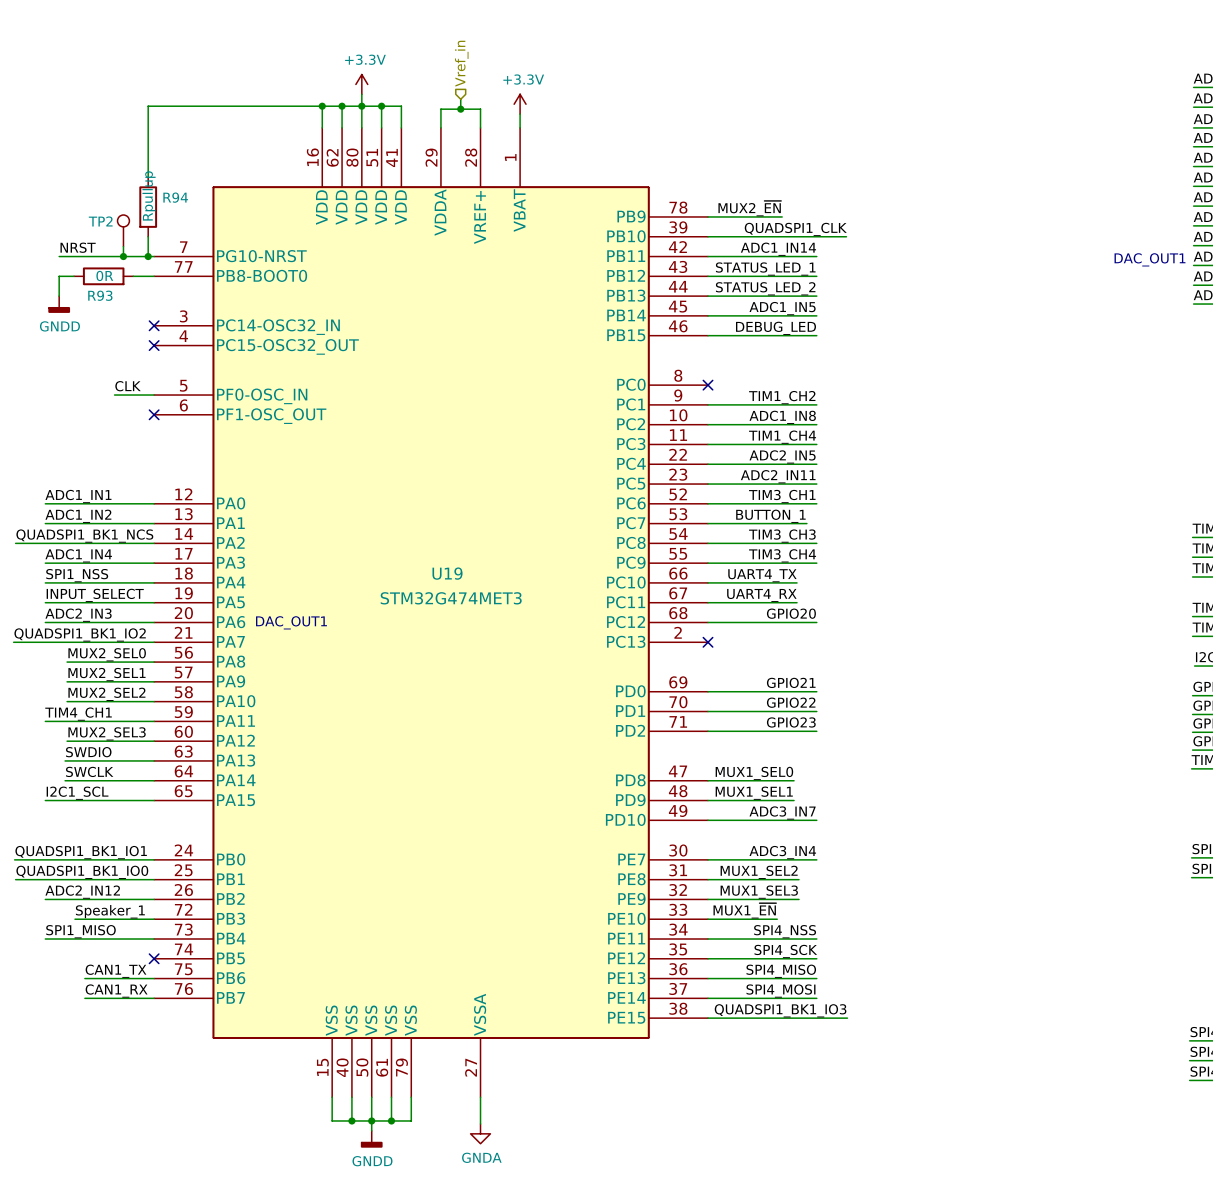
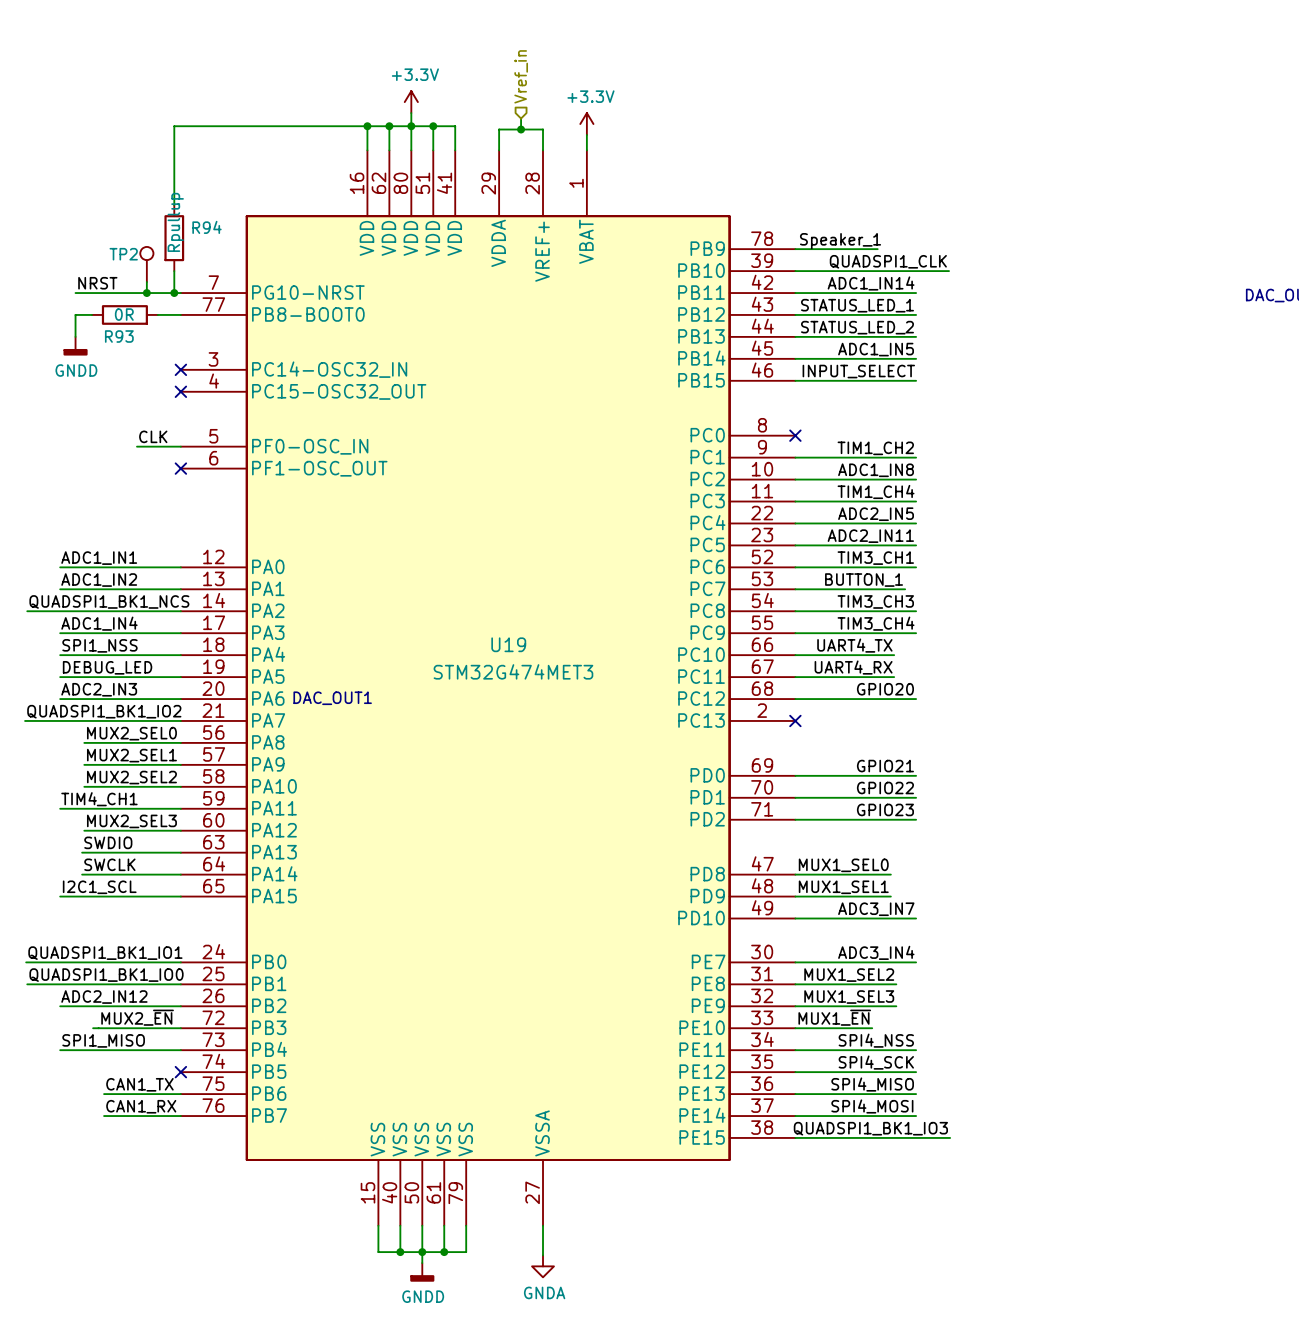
label: MUX2_~{EN} (749, 208) -> Speaker_1 (840, 241)
label: DEBUG_LED (776, 328) -> INPUT_SELECT (858, 371)
label: INPUT_SELECT (95, 595) -> DEBUG_LED (107, 667)
label: Speaker_1 (110, 911) -> MUX2_~{EN} (137, 1017)

